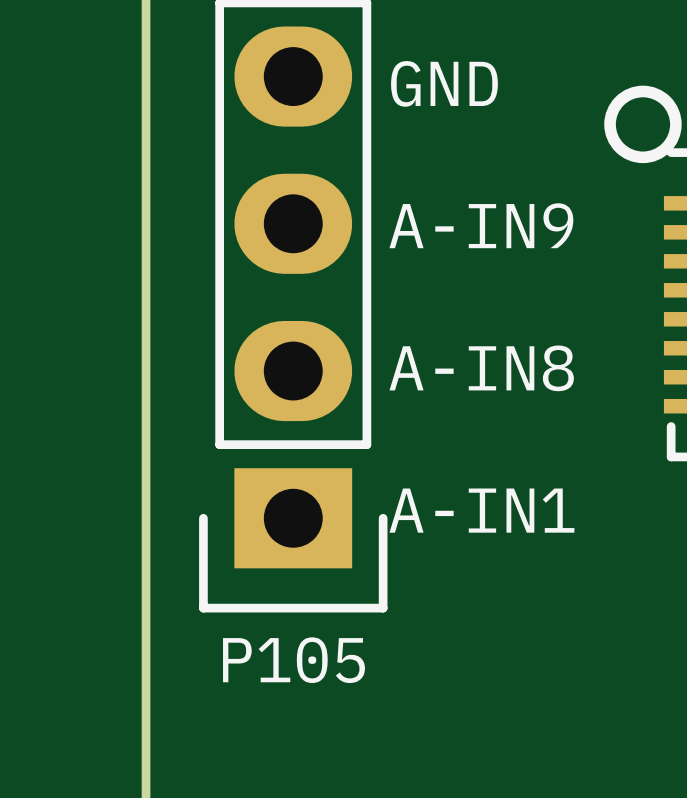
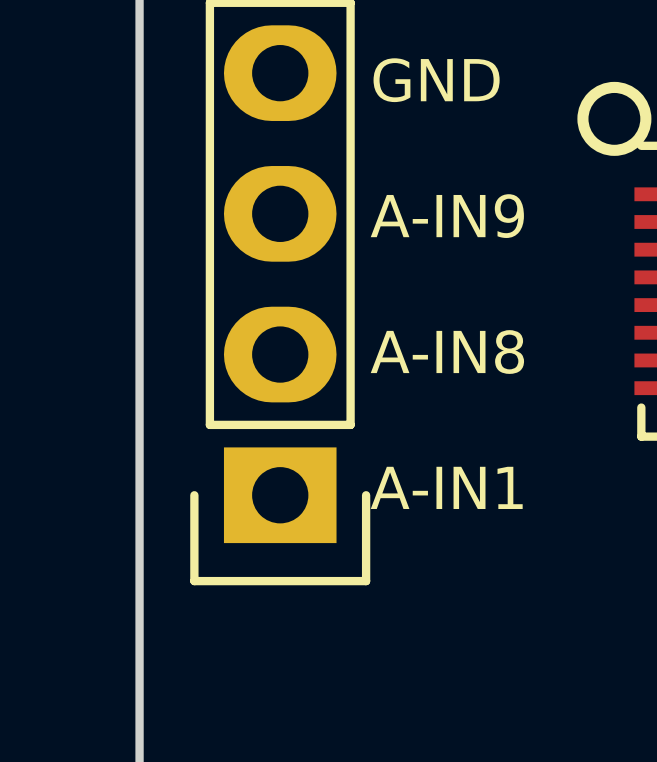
P105 name: P105 (294, 660) -> none

